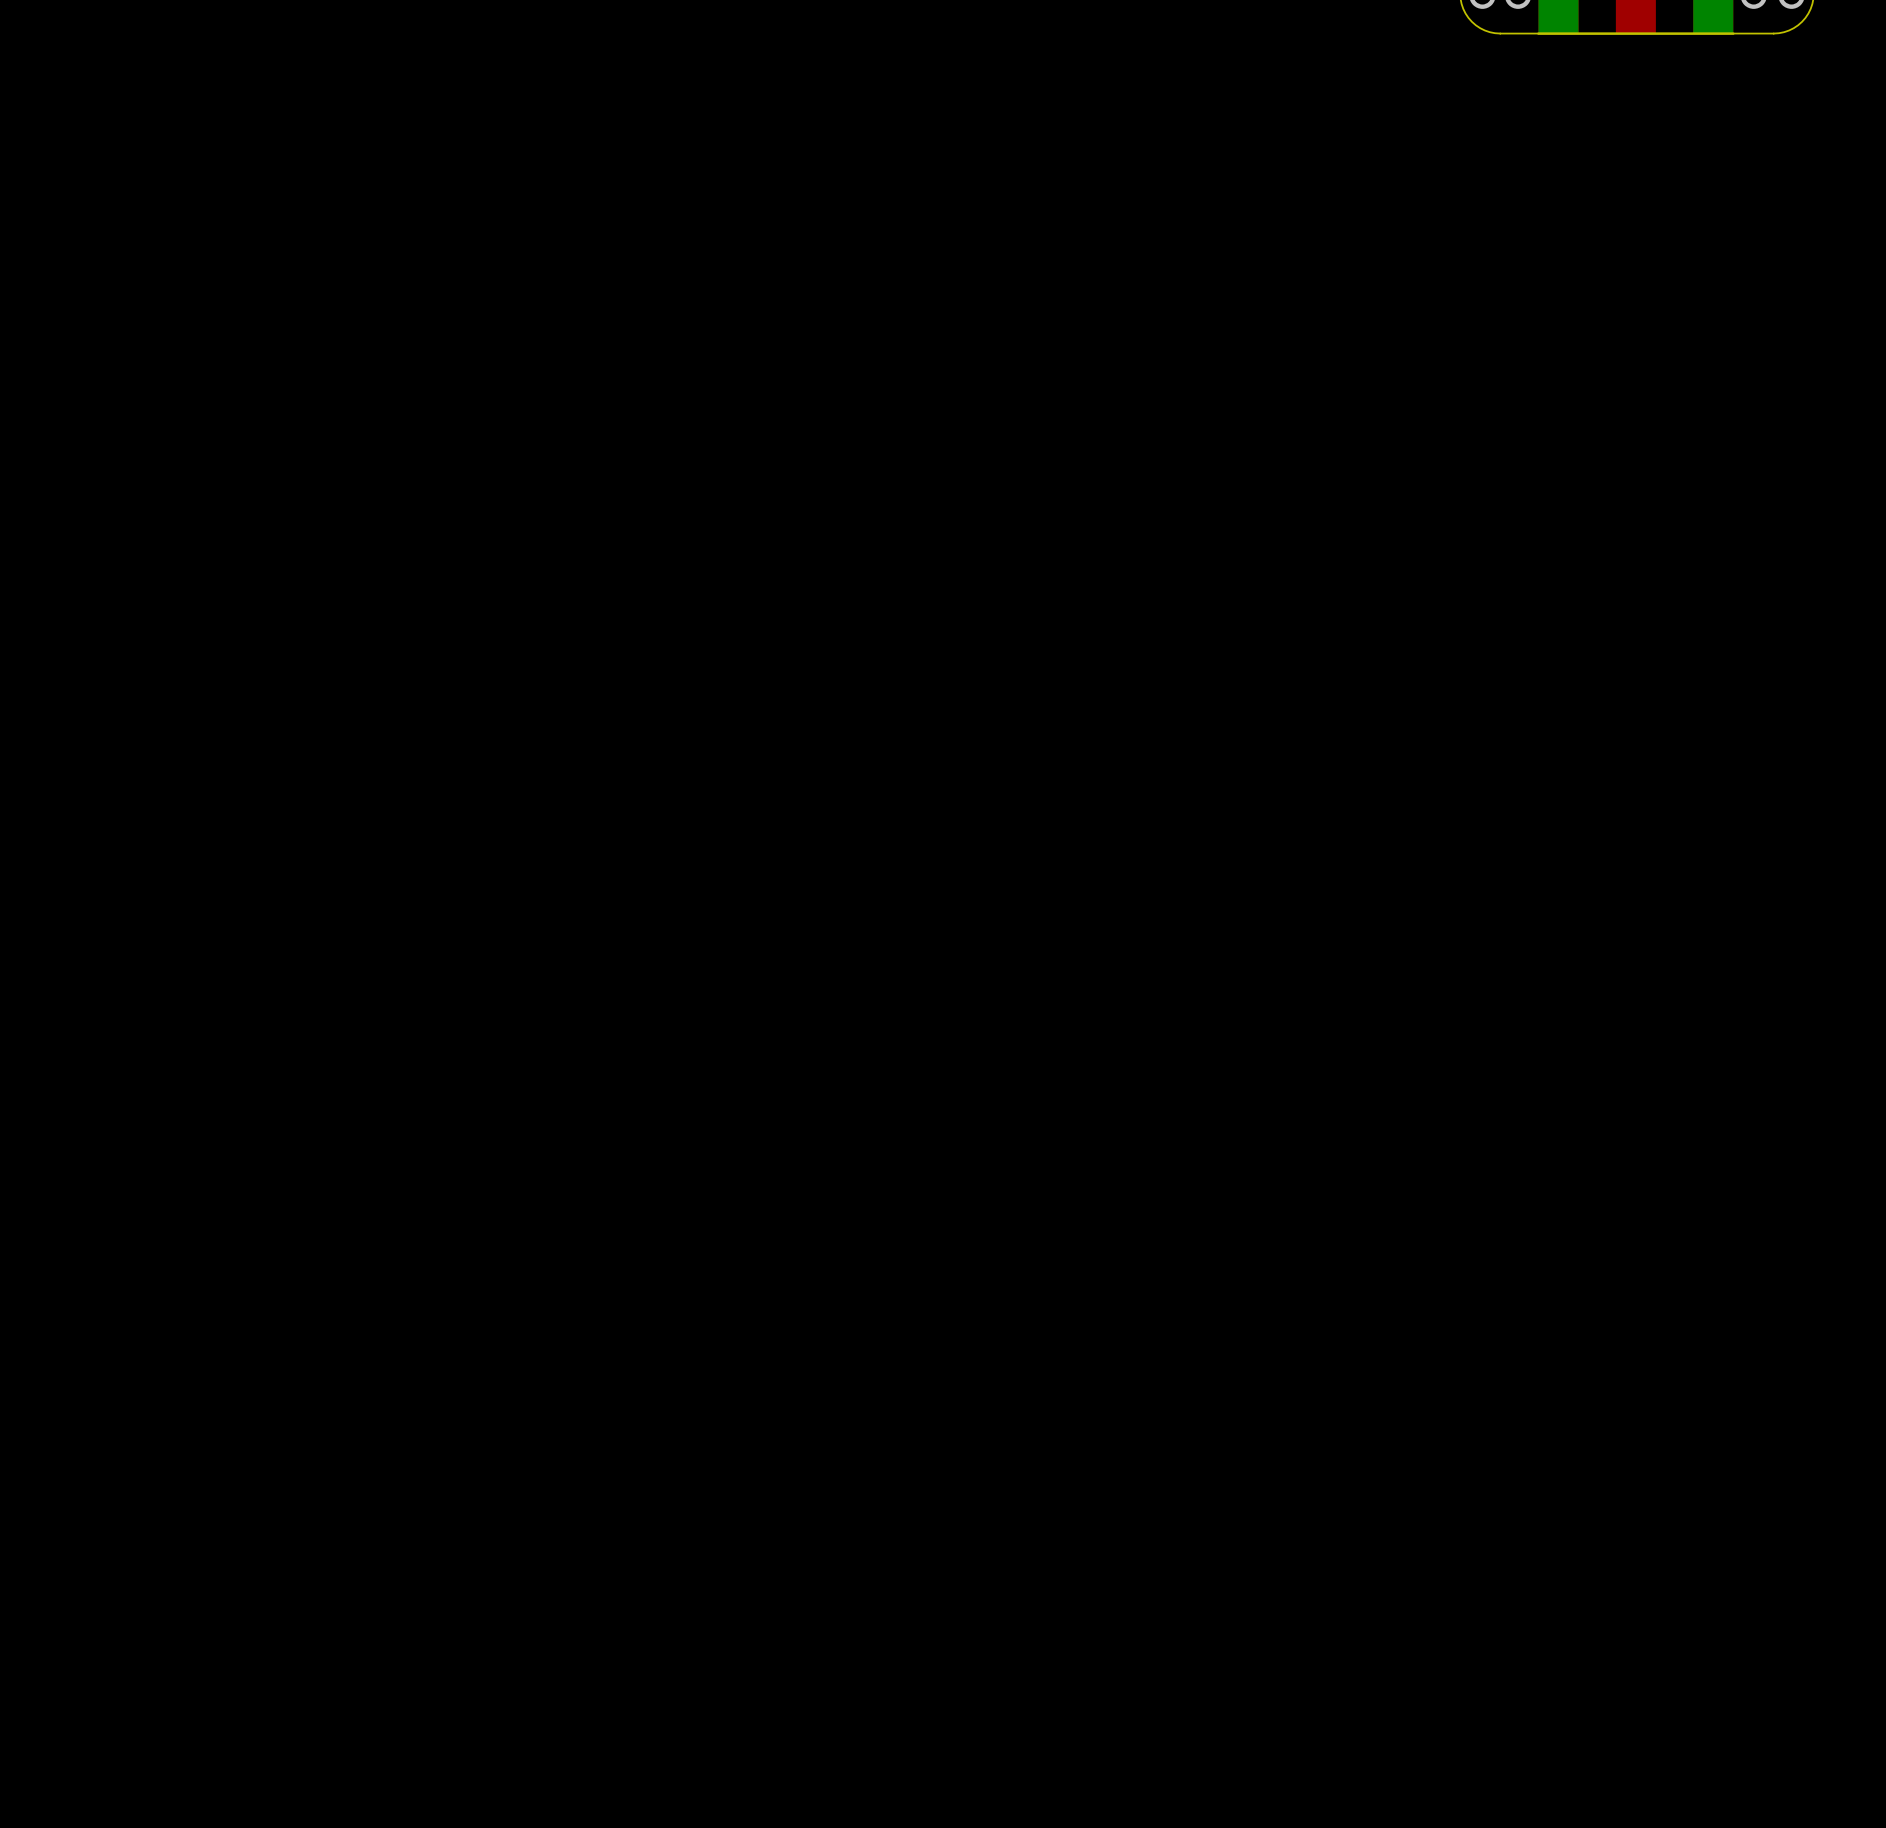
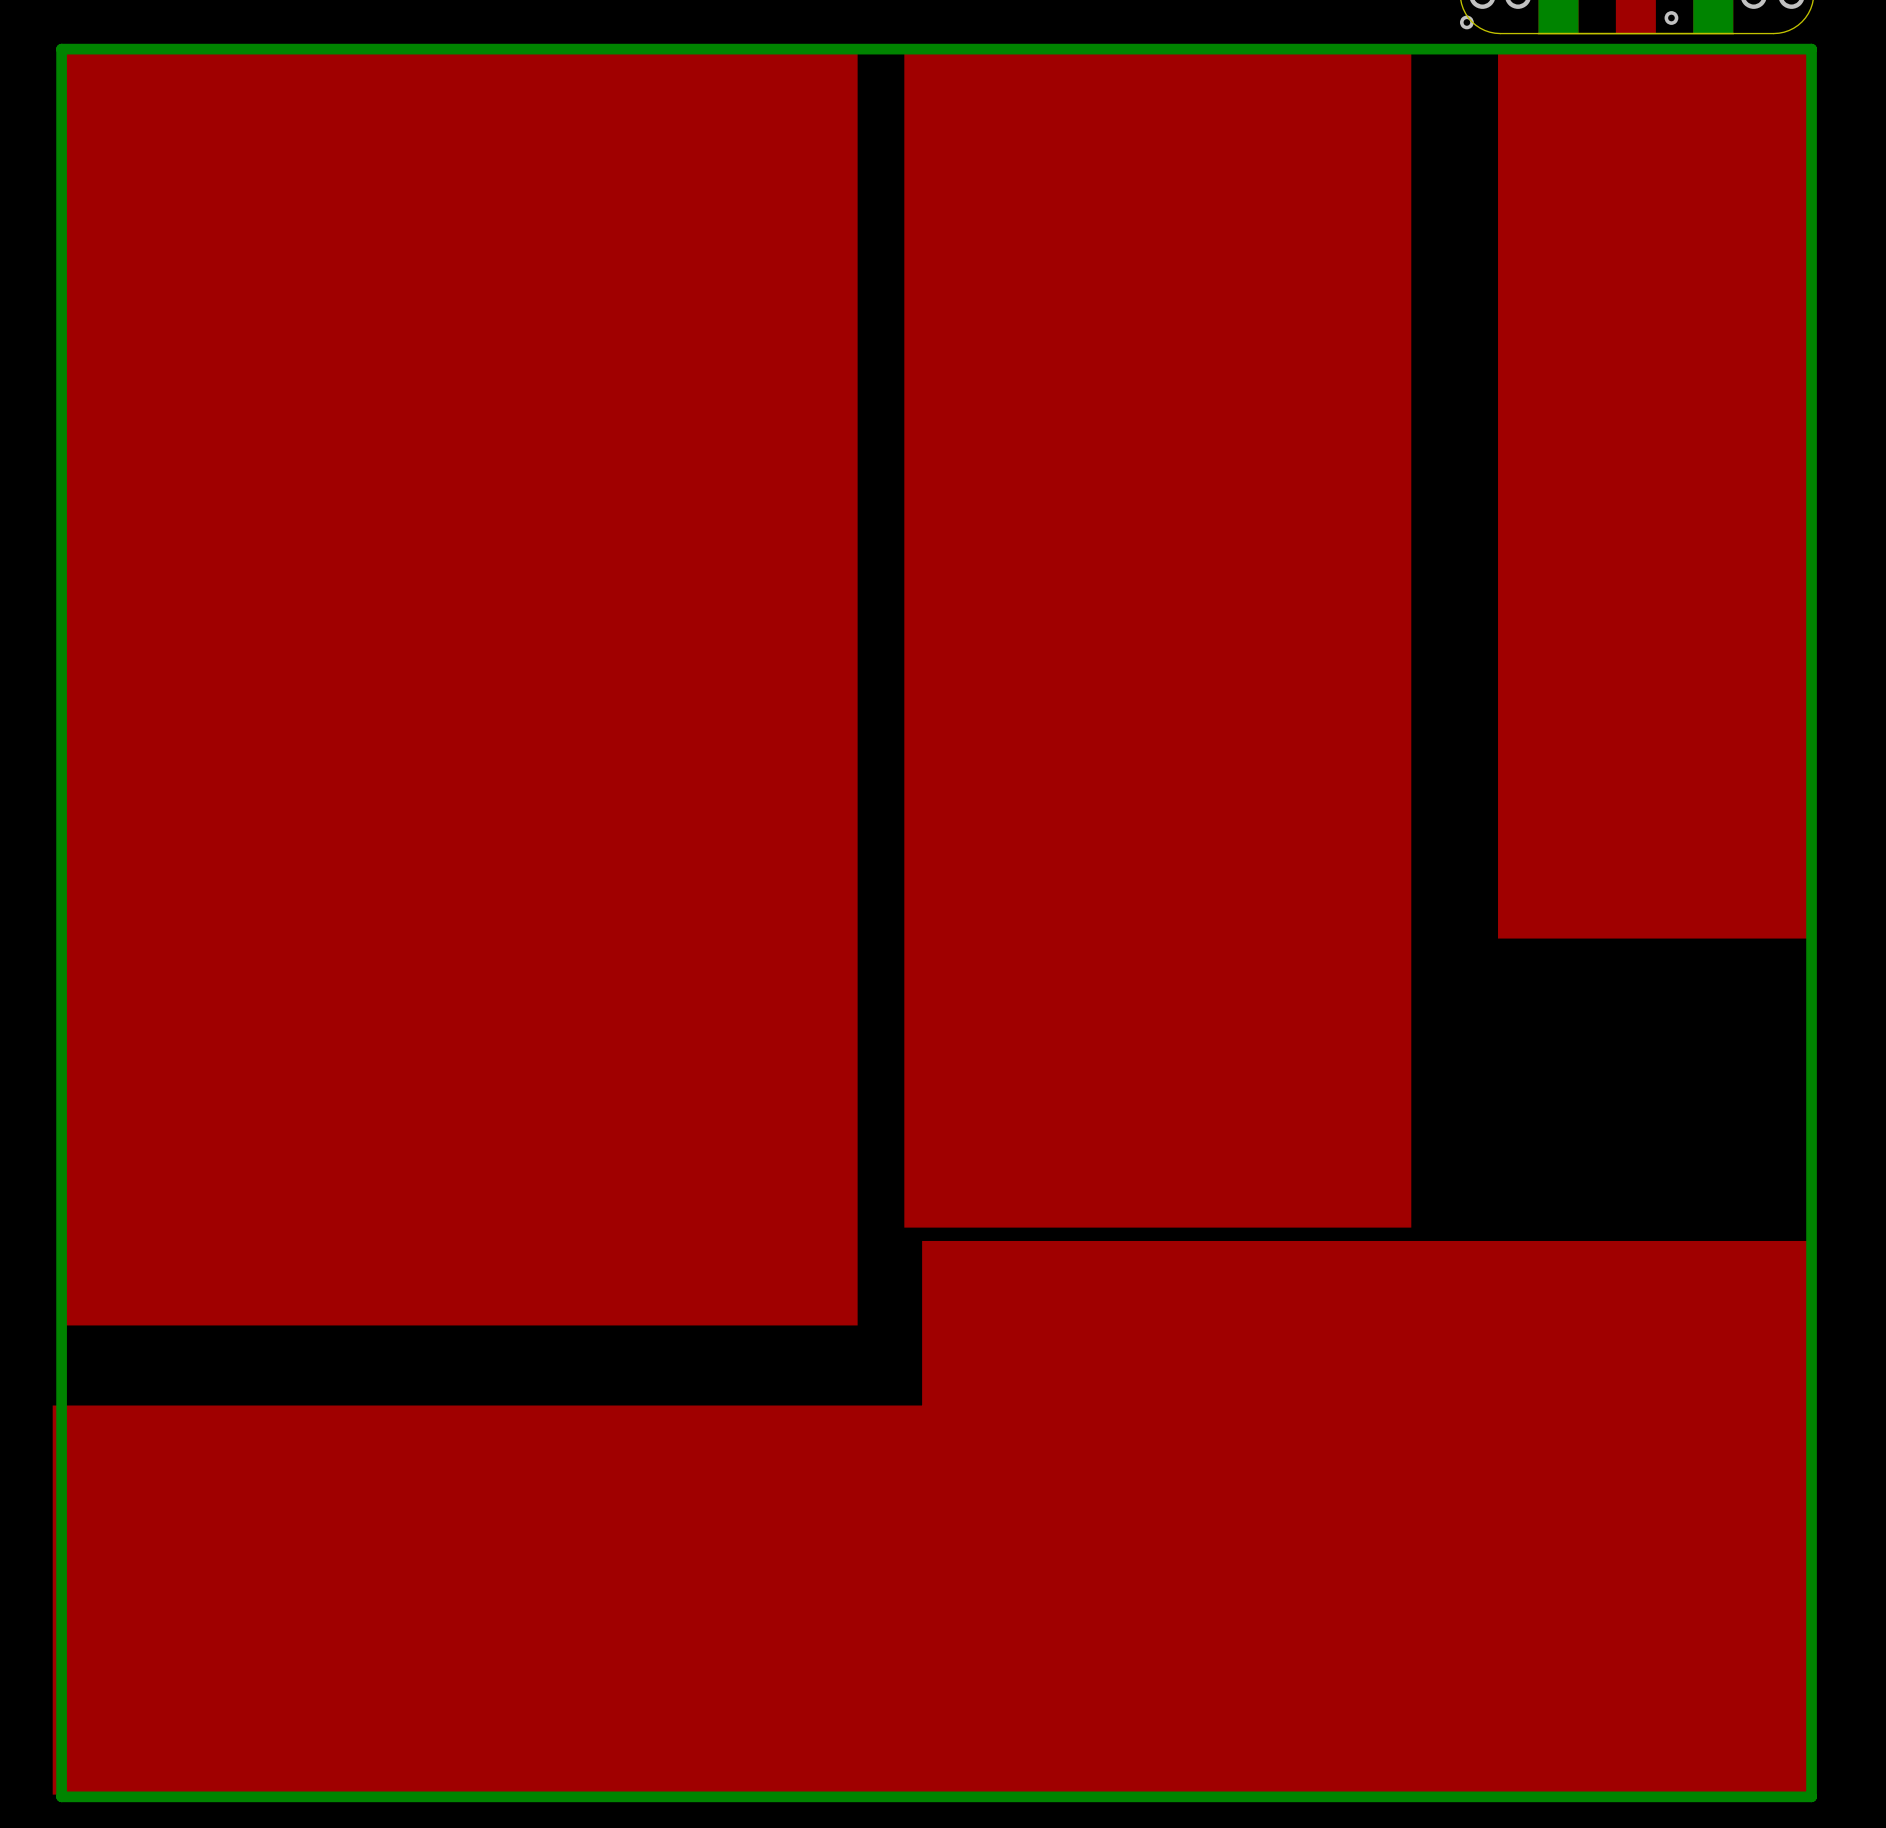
via: none -> (1671, 17)
via: none -> (1466, 22)
drawing: none -> [52, 49, 1812, 1800]
drawing: none -> [61, 49, 858, 1326]
drawing: none -> [1498, 49, 1812, 939]
bottom track: none -> (1811, 49) (1811, 1796) (61, 1796) (61, 49) (1811, 49)

